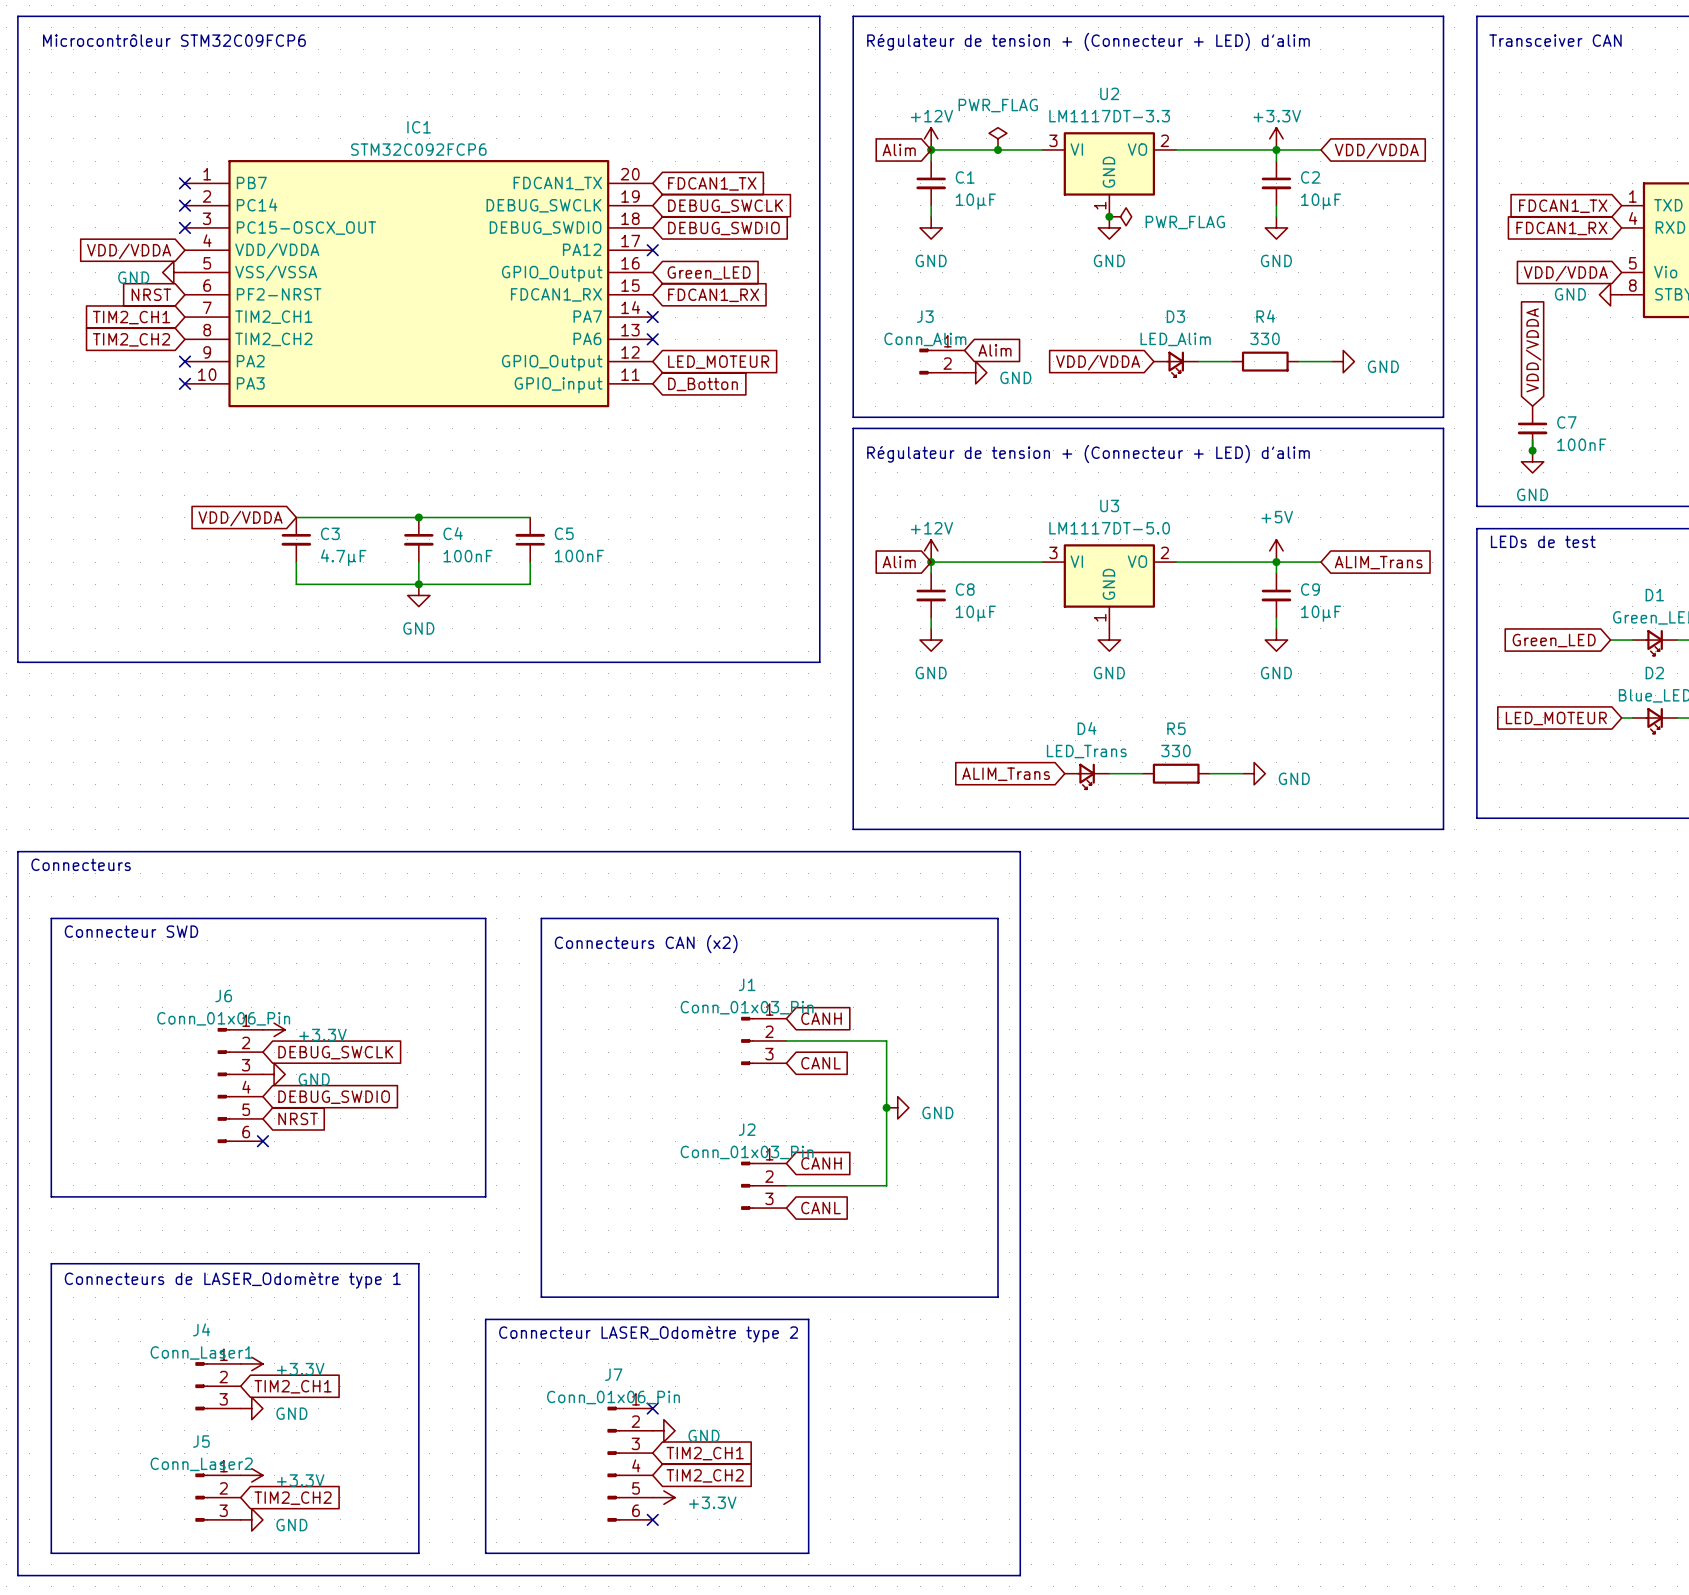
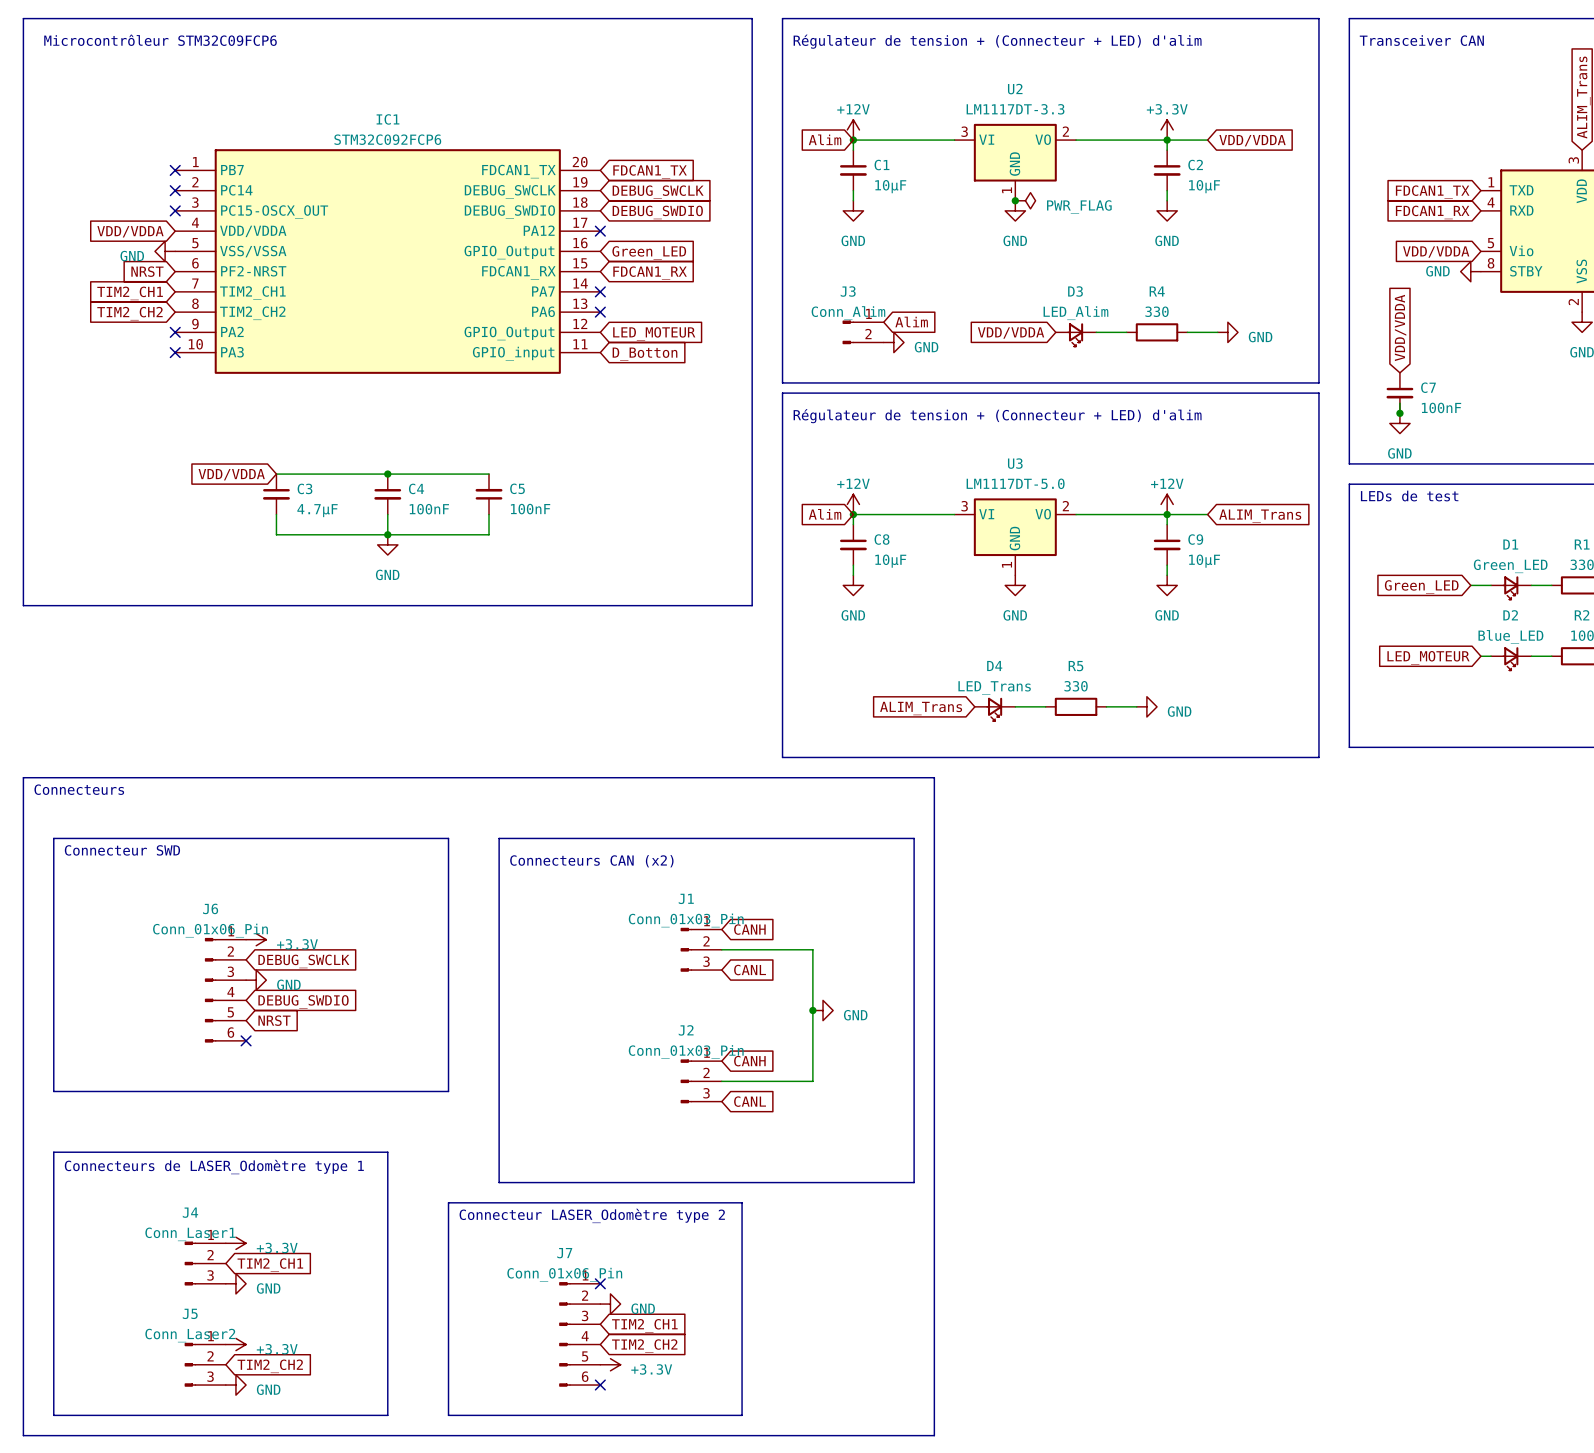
power symbol: PWR_FLAG (997, 138) -> none
junction: (997, 149) -> none
power symbol: +5V (1276, 550) -> +12V (1167, 504)

